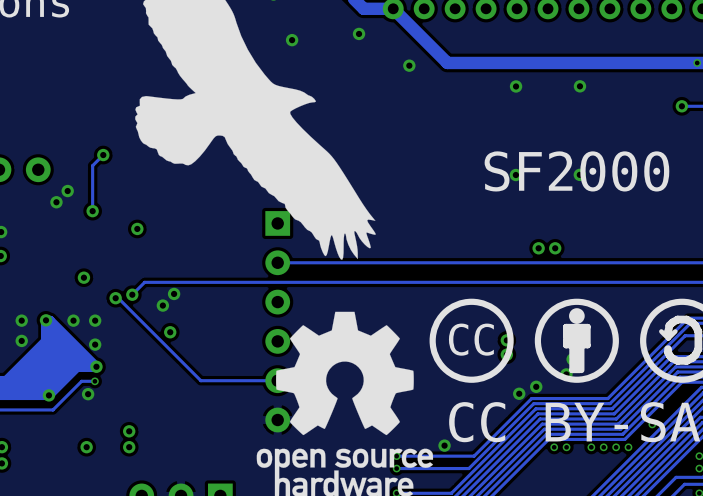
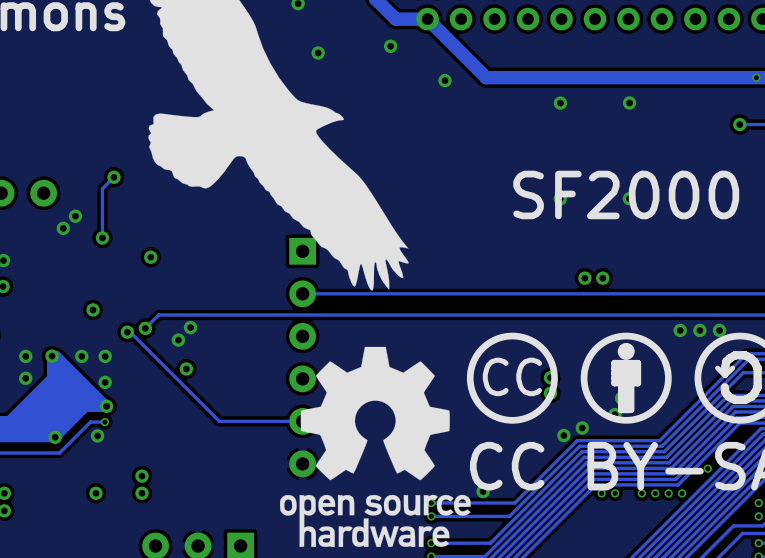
via: none -> (680, 330)
via: none -> (699, 330)
via: none -> (719, 330)

